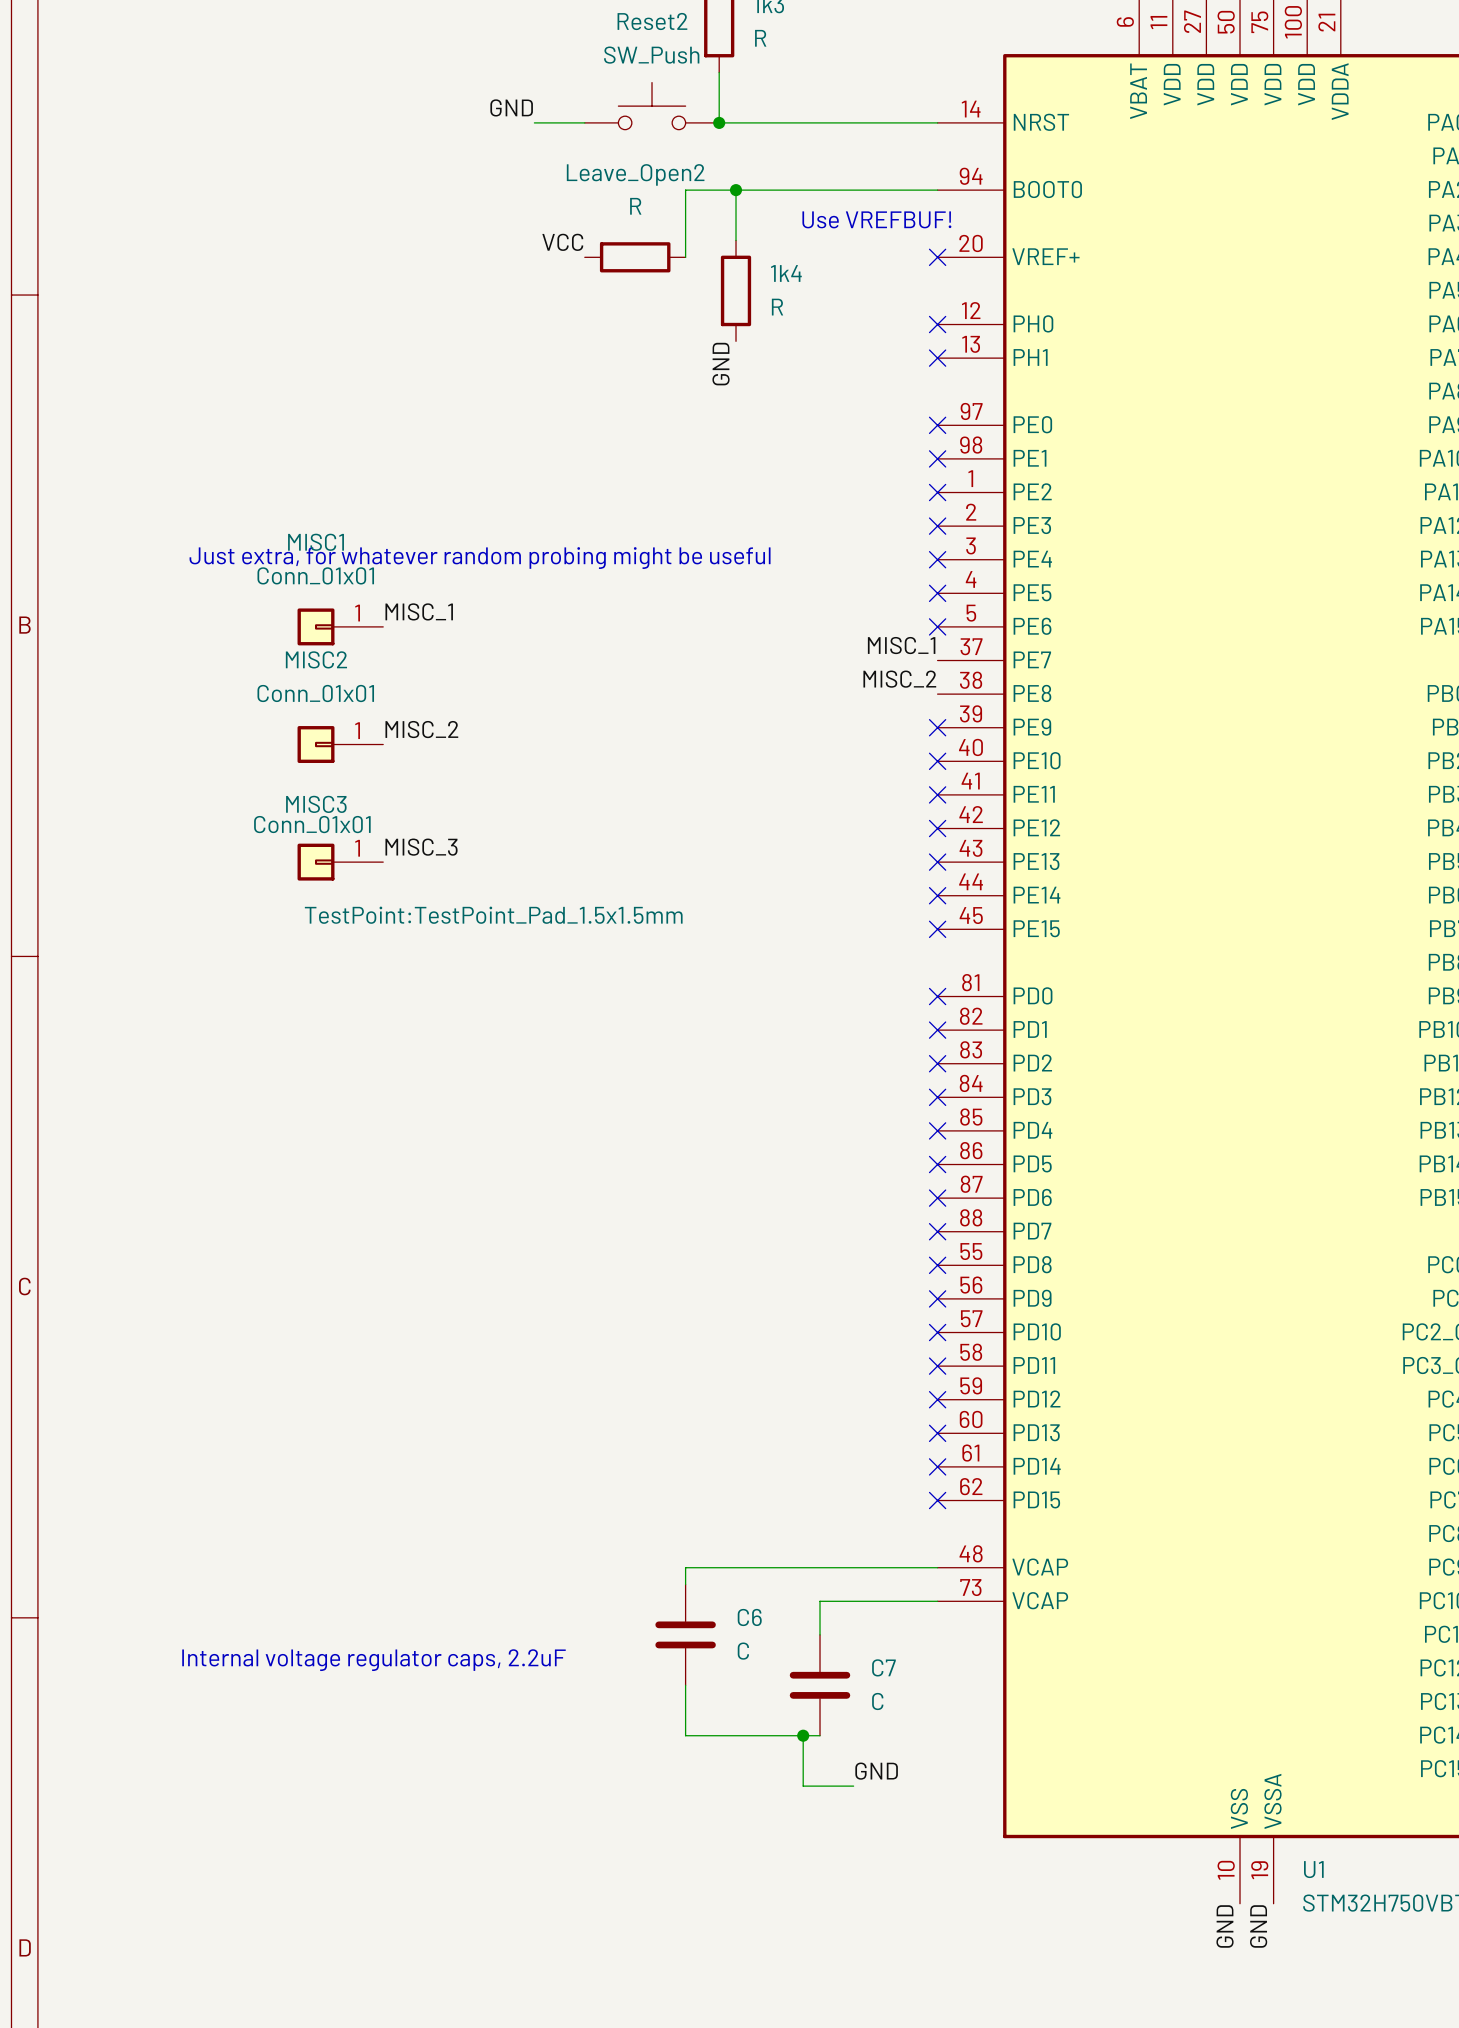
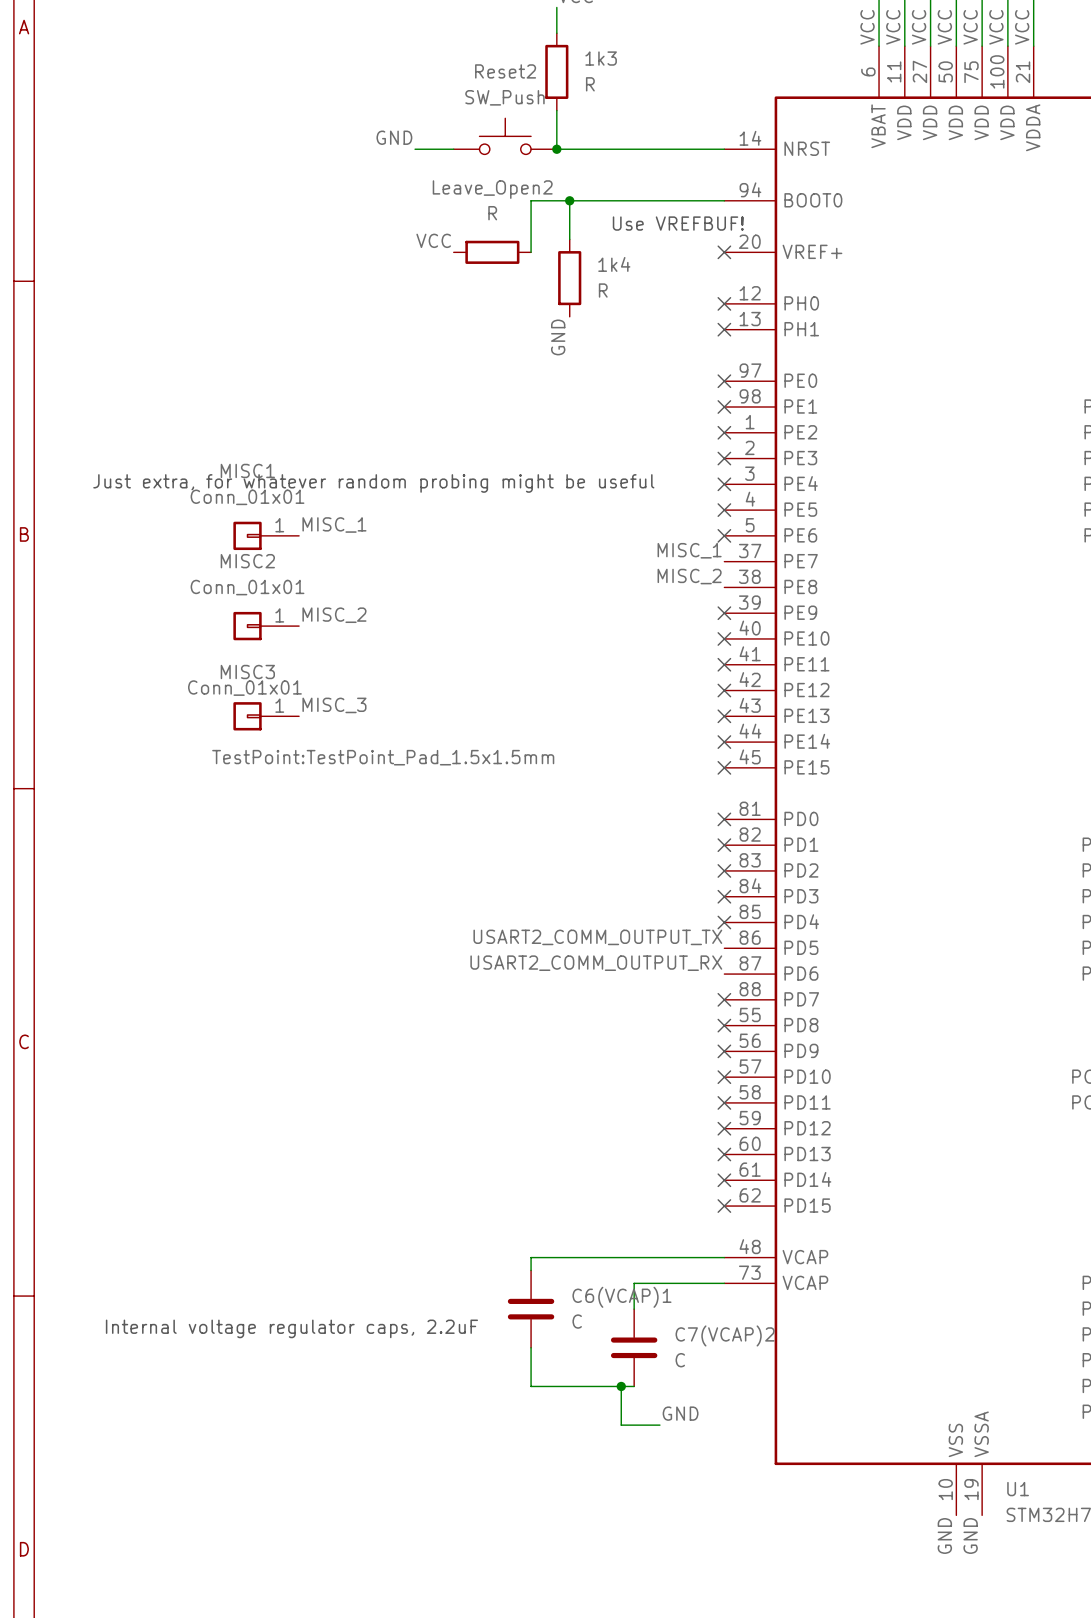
label: none -> USART2_COMM_OUTPUT_TX (597, 937)
no-connect mark: (937, 1164) -> none
label: none -> USART2_COMM_OUTPUT_RX (596, 963)
no-connect mark: (937, 1198) -> none
C6 name: C6 (749, 1617) -> C6(VCAP)1 (621, 1297)
C7 name: C7 (883, 1667) -> C7(VCAP)2 (725, 1335)

